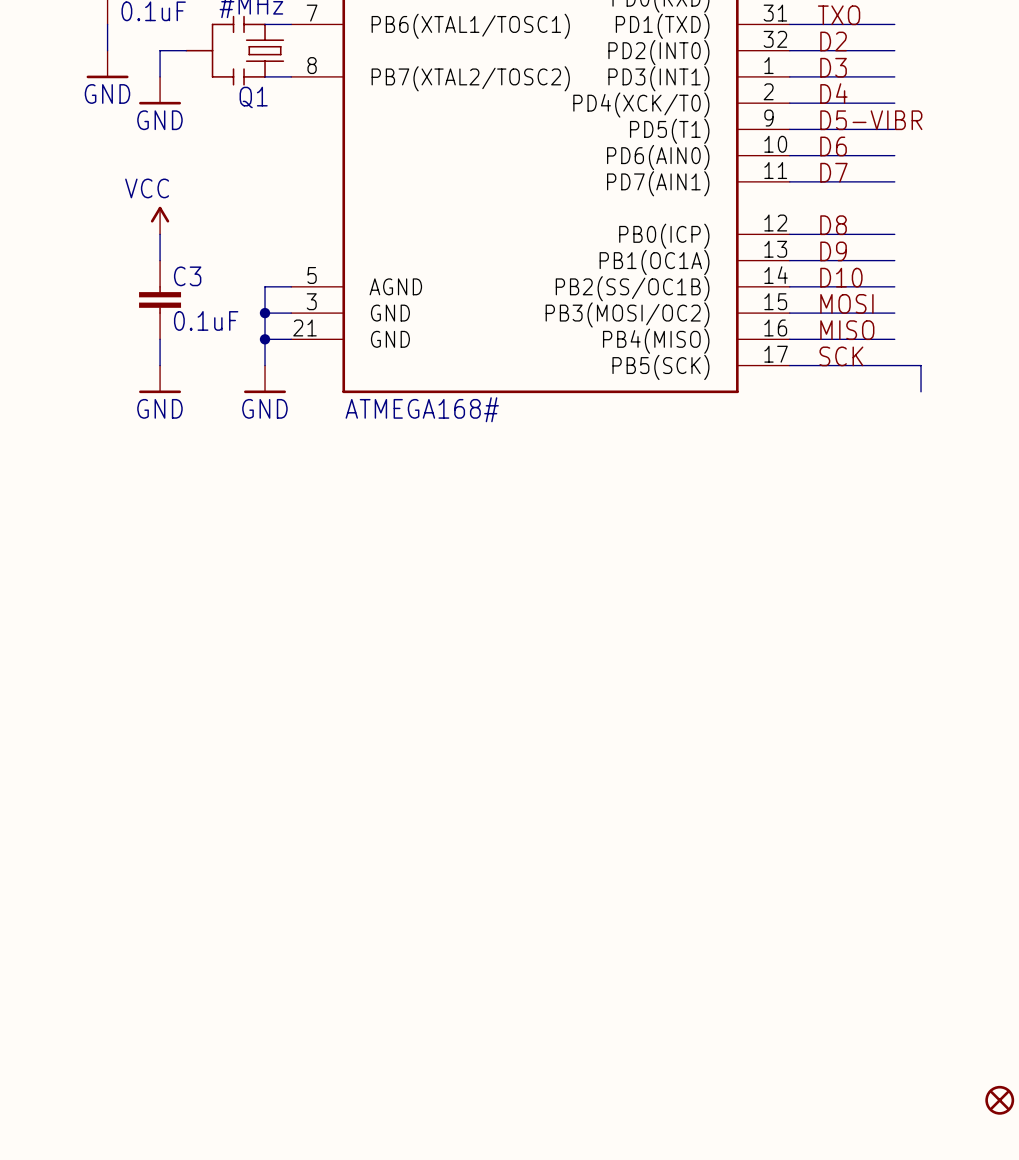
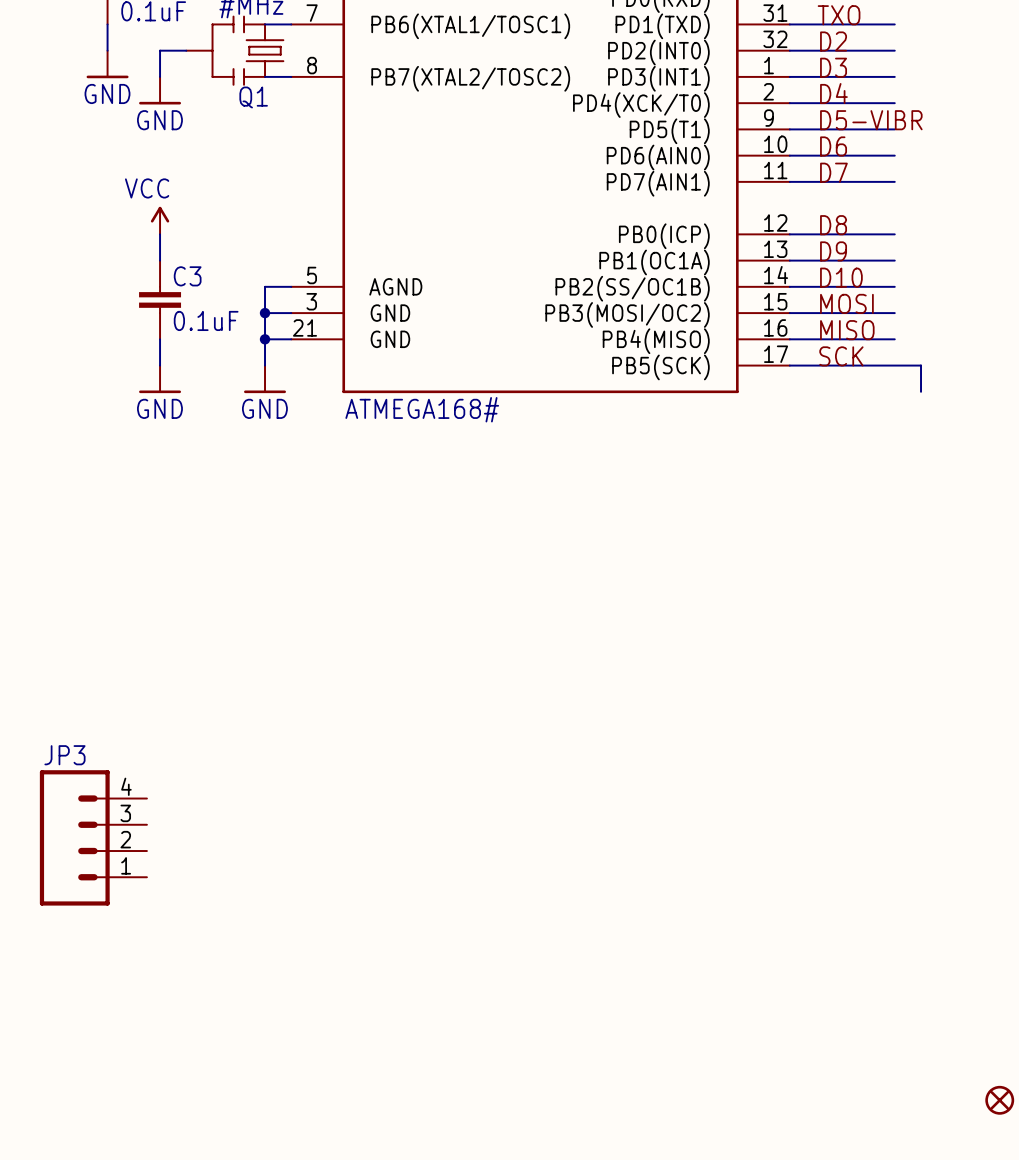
JP3: none -> (93, 837)

